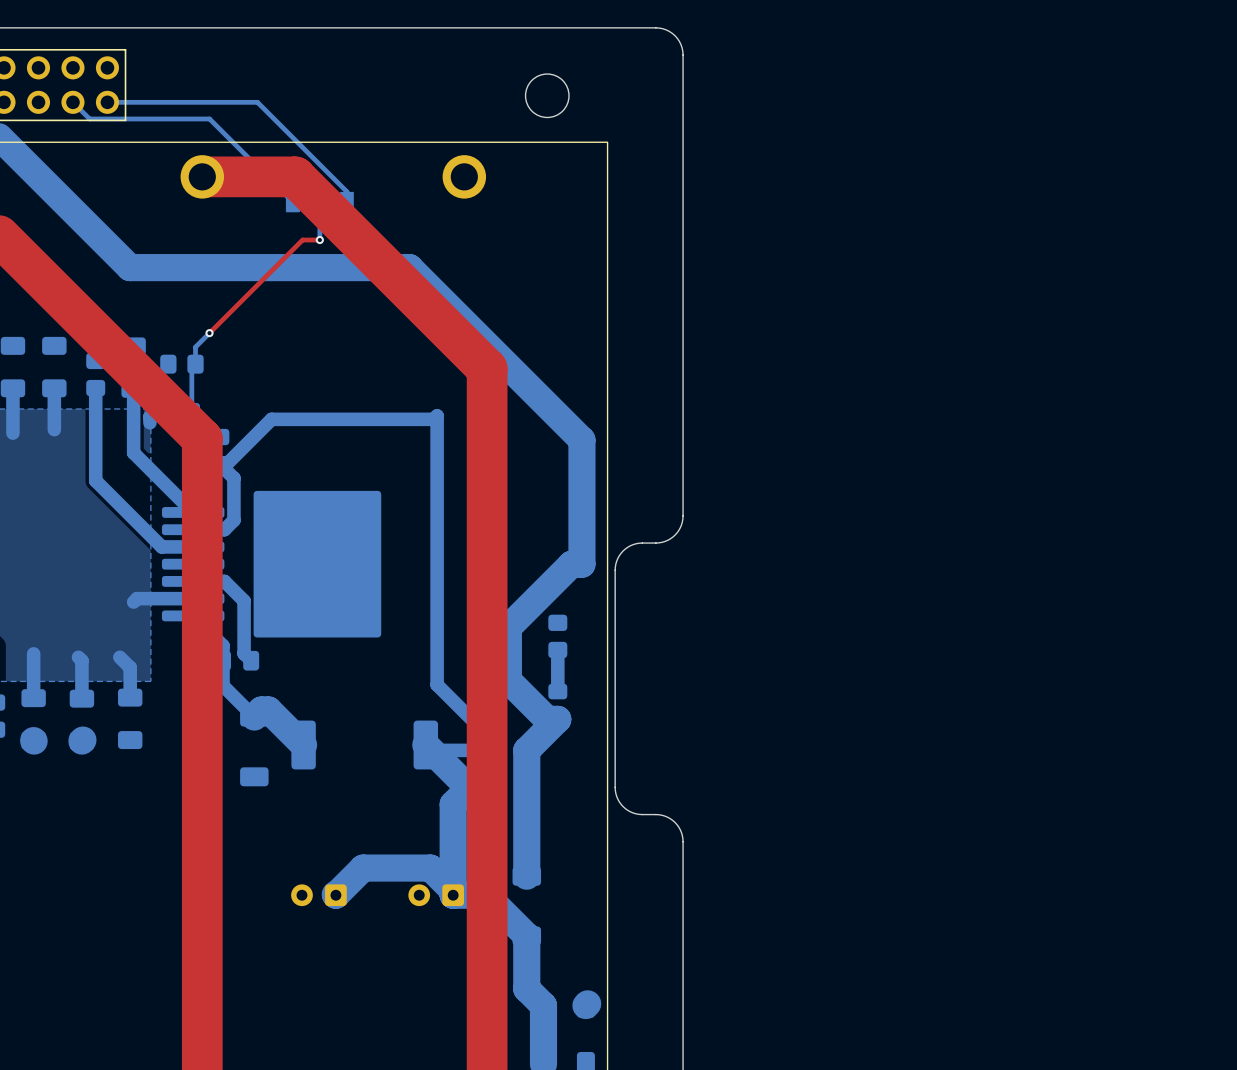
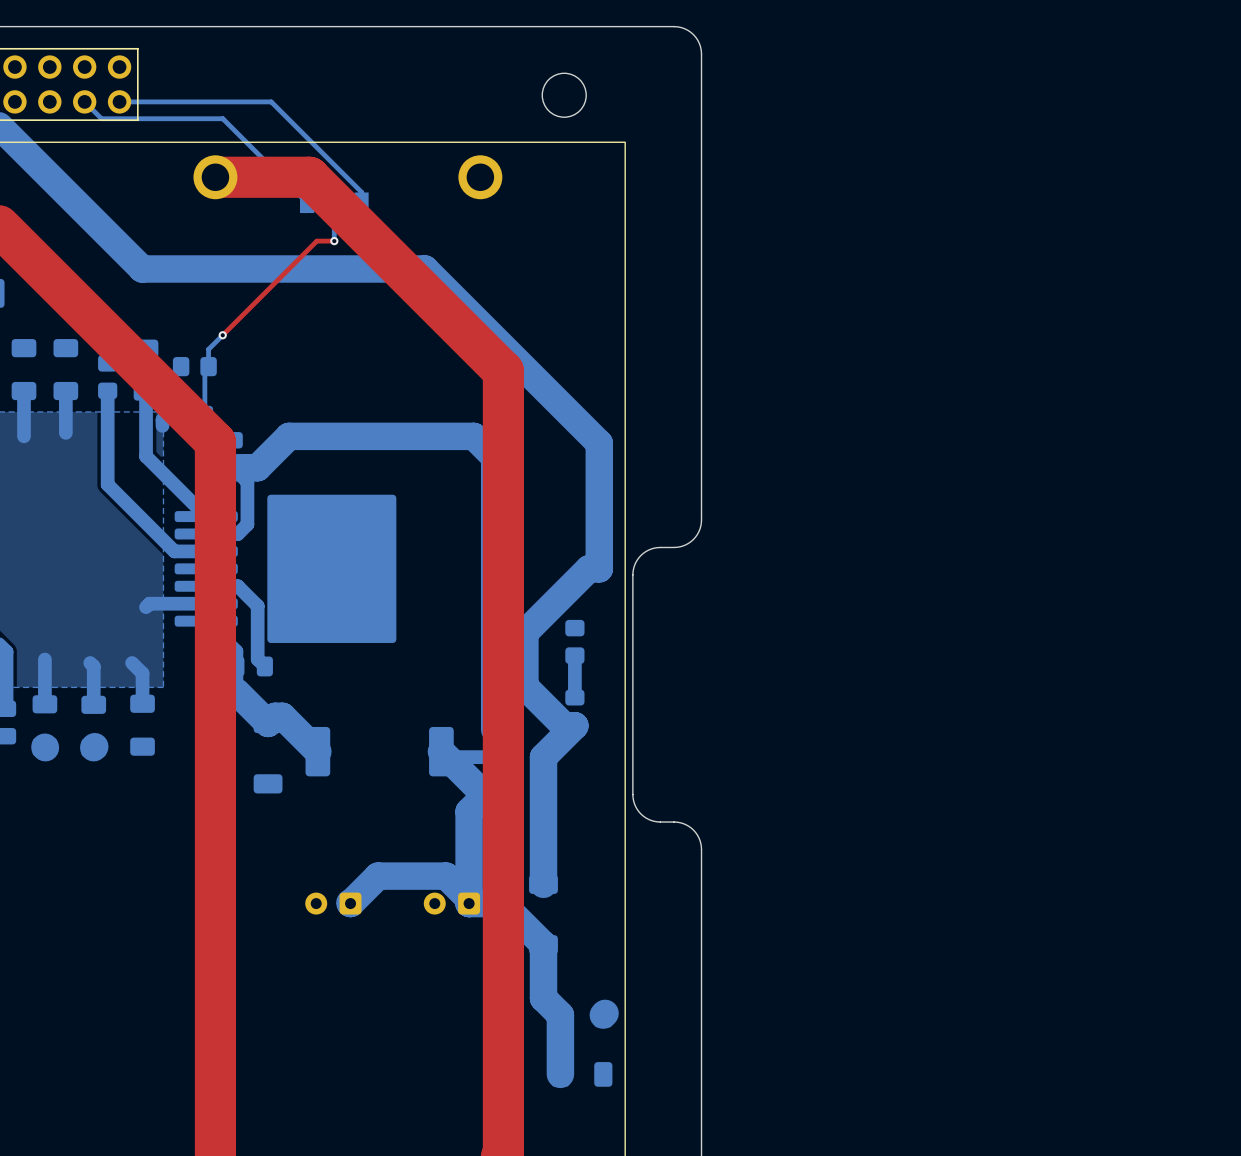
bottom track: (226, 464) (271, 419) (433, 419) (437, 415) (437, 684) (475, 723) (478, 723) -> (240, 467) (257, 467) (288, 436) (473, 436) (494, 457) (494, 729)
bottom track width: thin (223, 685) (254, 717) -> thick (236, 691) (268, 723)

